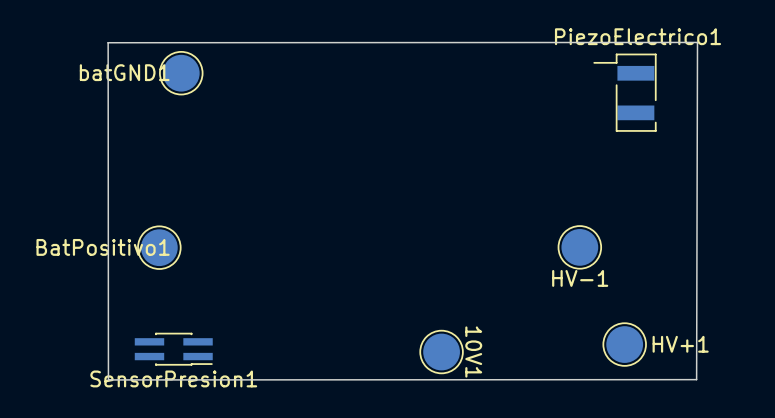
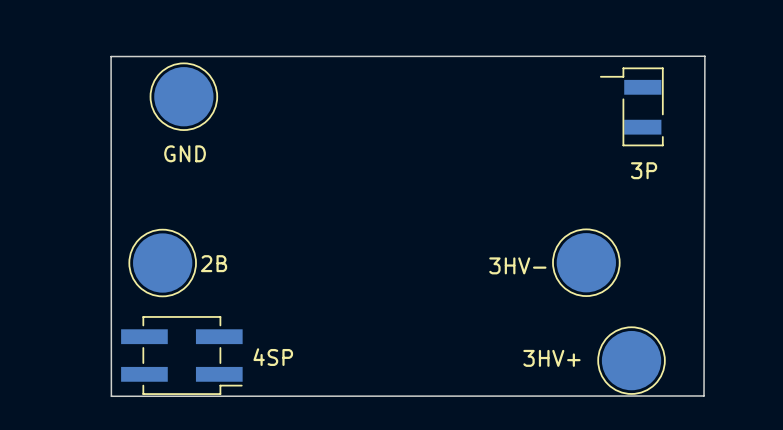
PiezoElectrico1 name: PiezoElectrico1 (638, 36) -> 3P (644, 170)
batGND1: (181, 73) -> none
GND: none -> (183, 96)
BatPositivo1: (159, 247) -> none
2B: none -> (162, 263)
HV-1: (579, 247) -> none
3HV-: none -> (586, 262)
4SP: none -> (181, 355)
HV+1: (624, 344) -> none
3HV+: none -> (631, 360)
SensorPresion1: (173, 349) -> none
10V1: (441, 352) -> none

